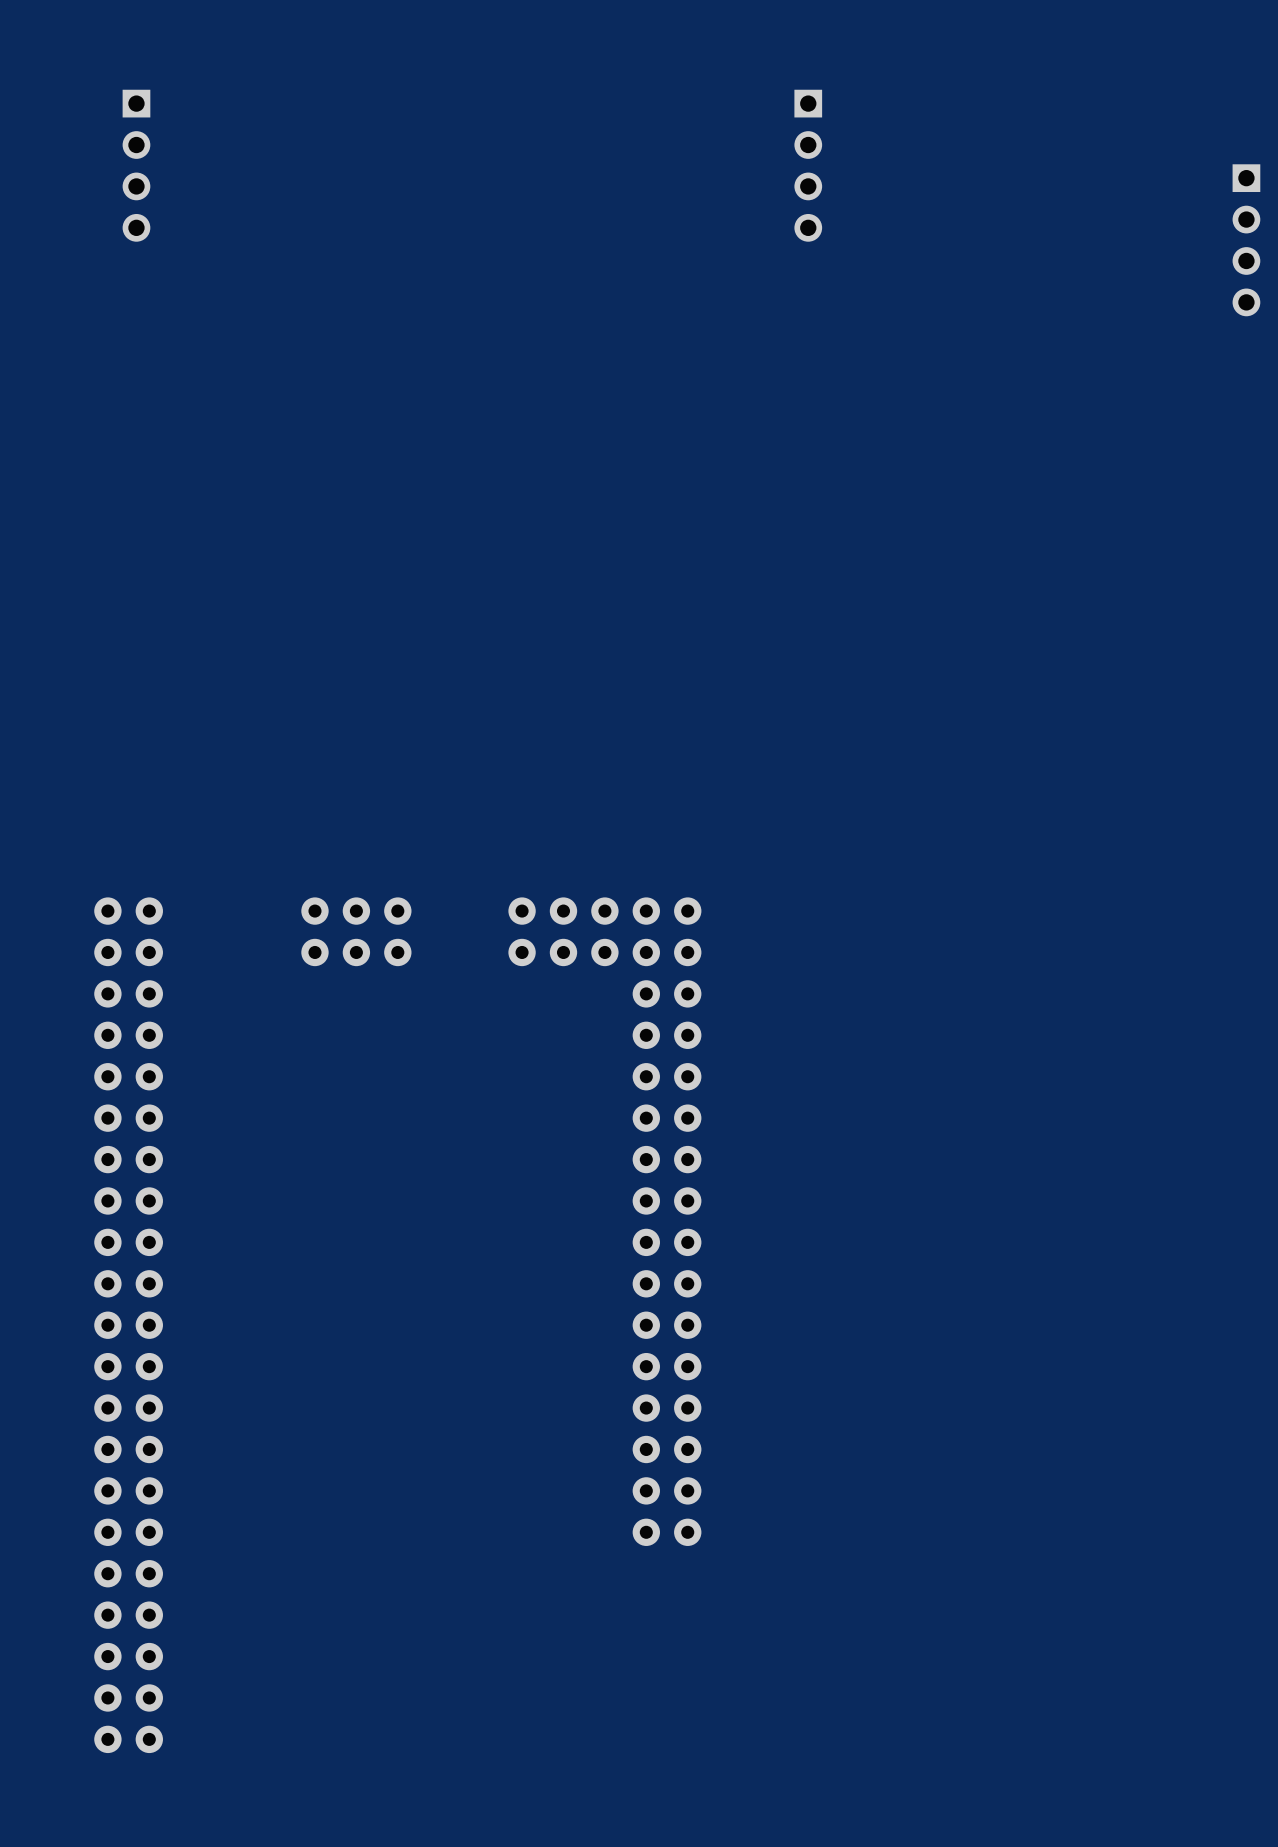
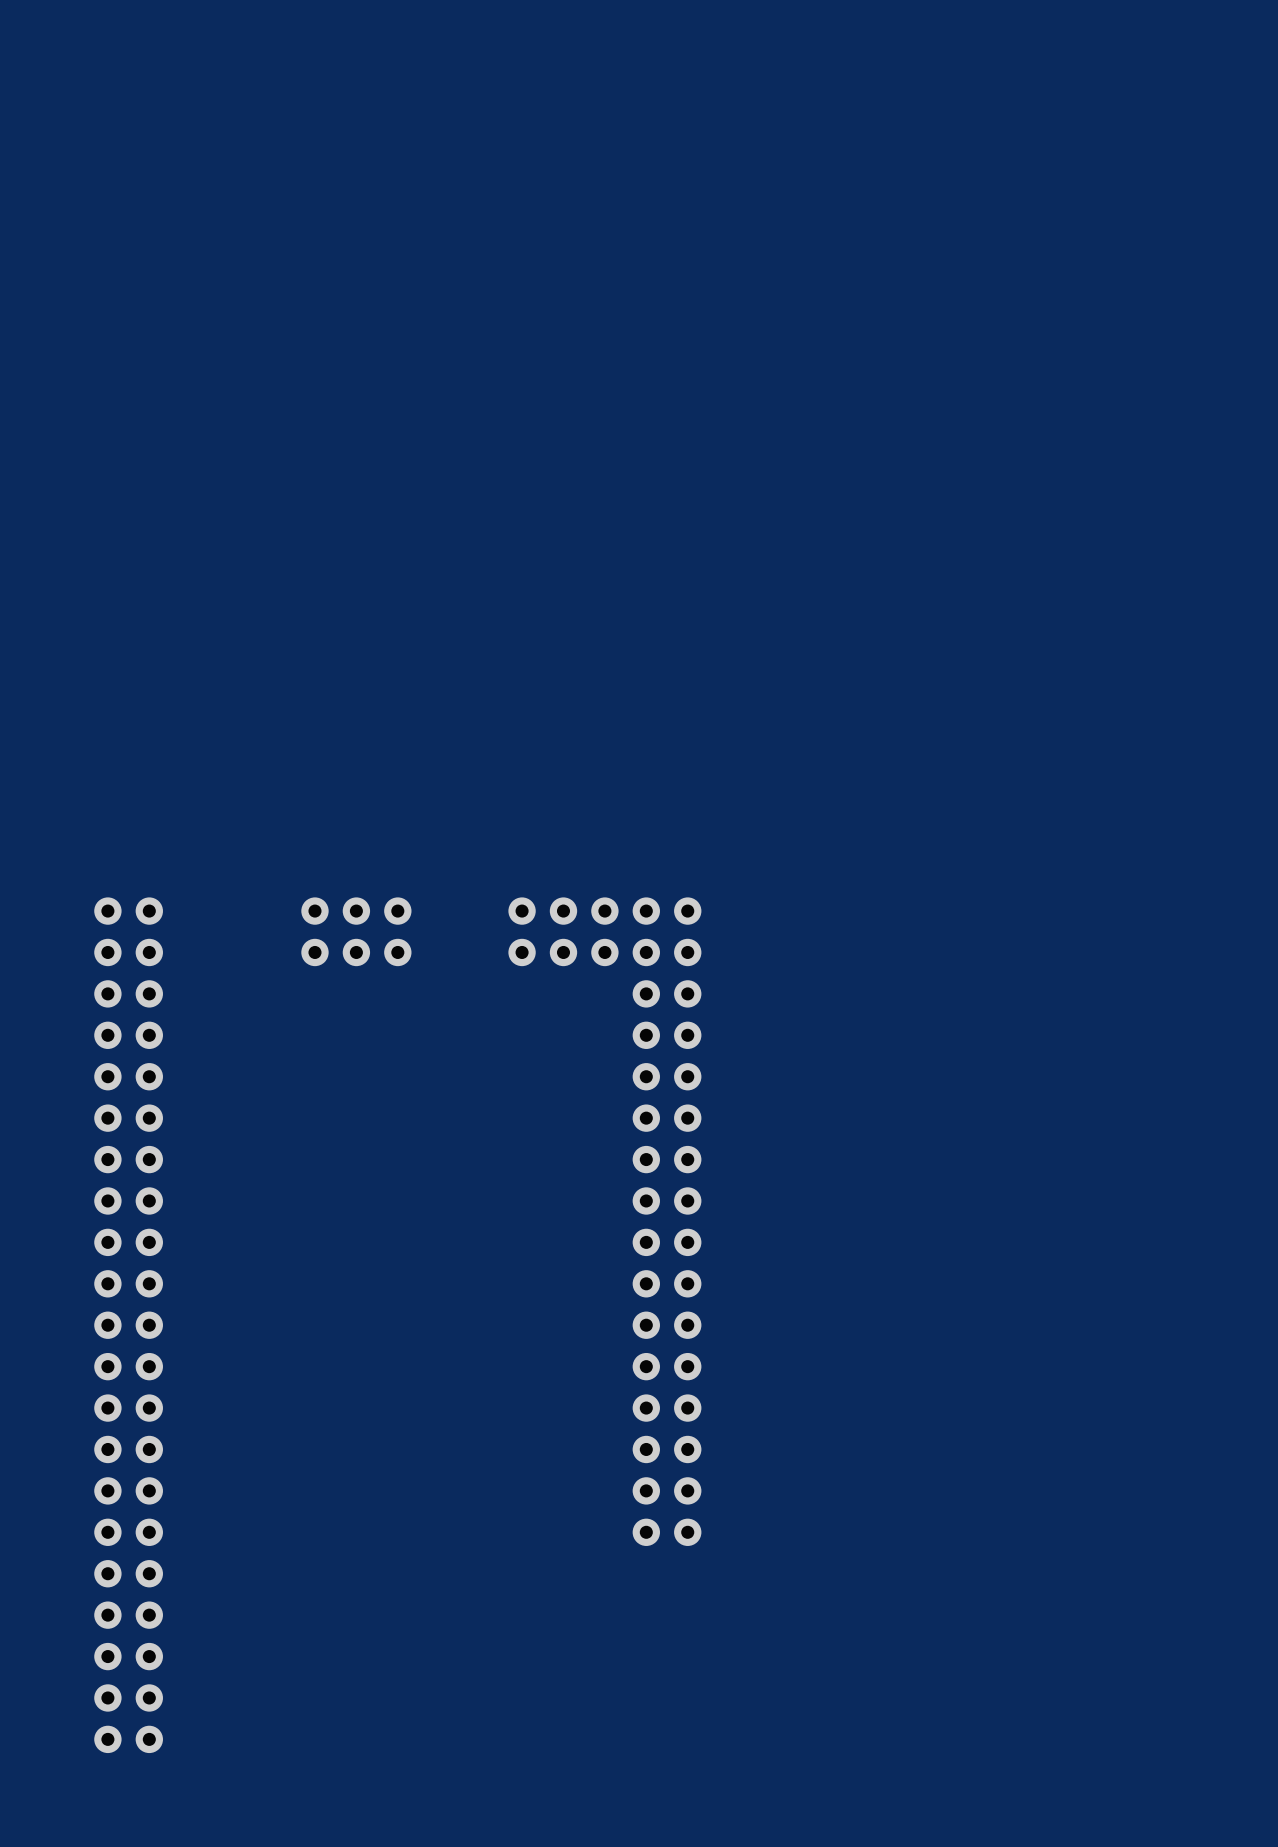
part: (136, 165) -> none
part: (808, 165) -> none
part: (1246, 240) -> none

